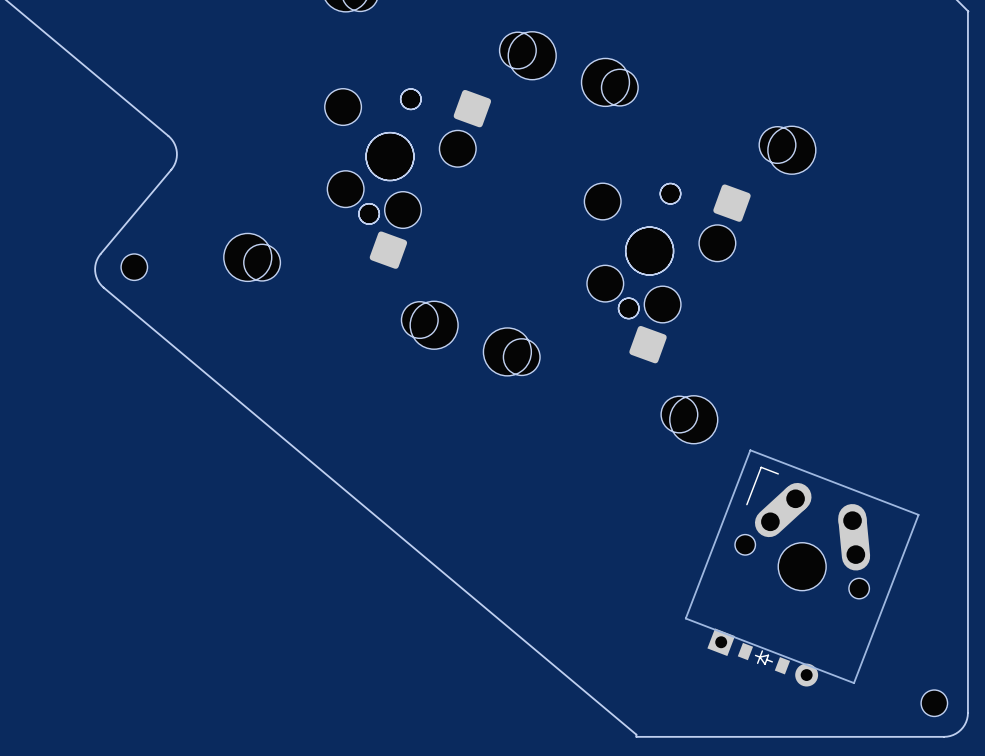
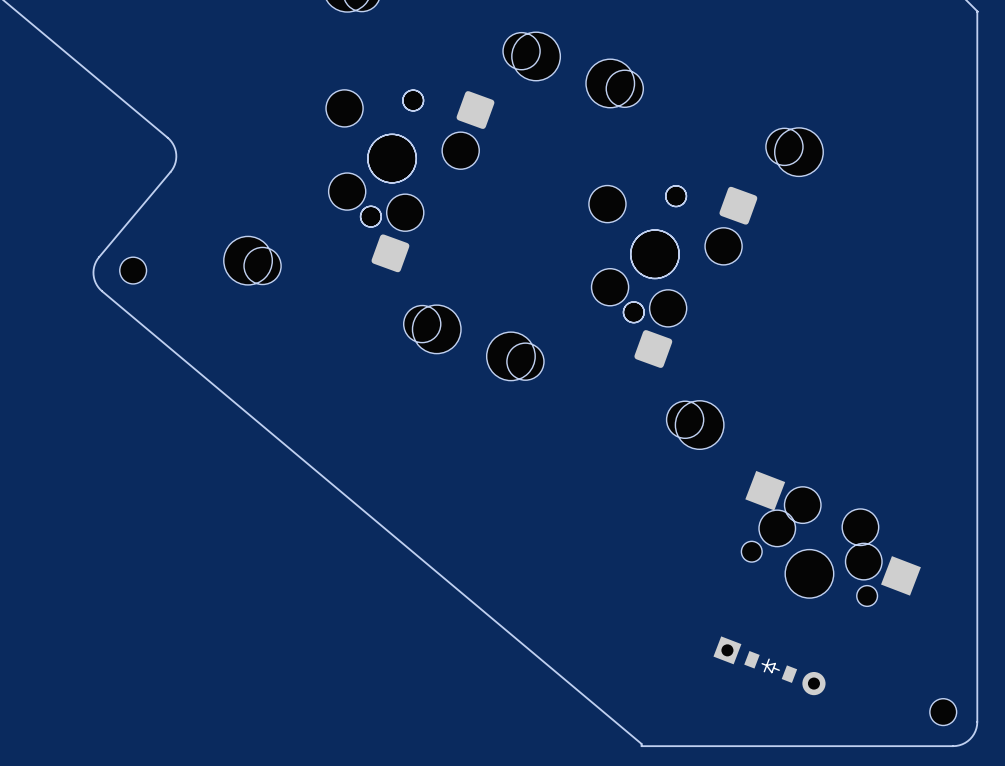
part: none -> (831, 538)
part: (802, 566) -> none

